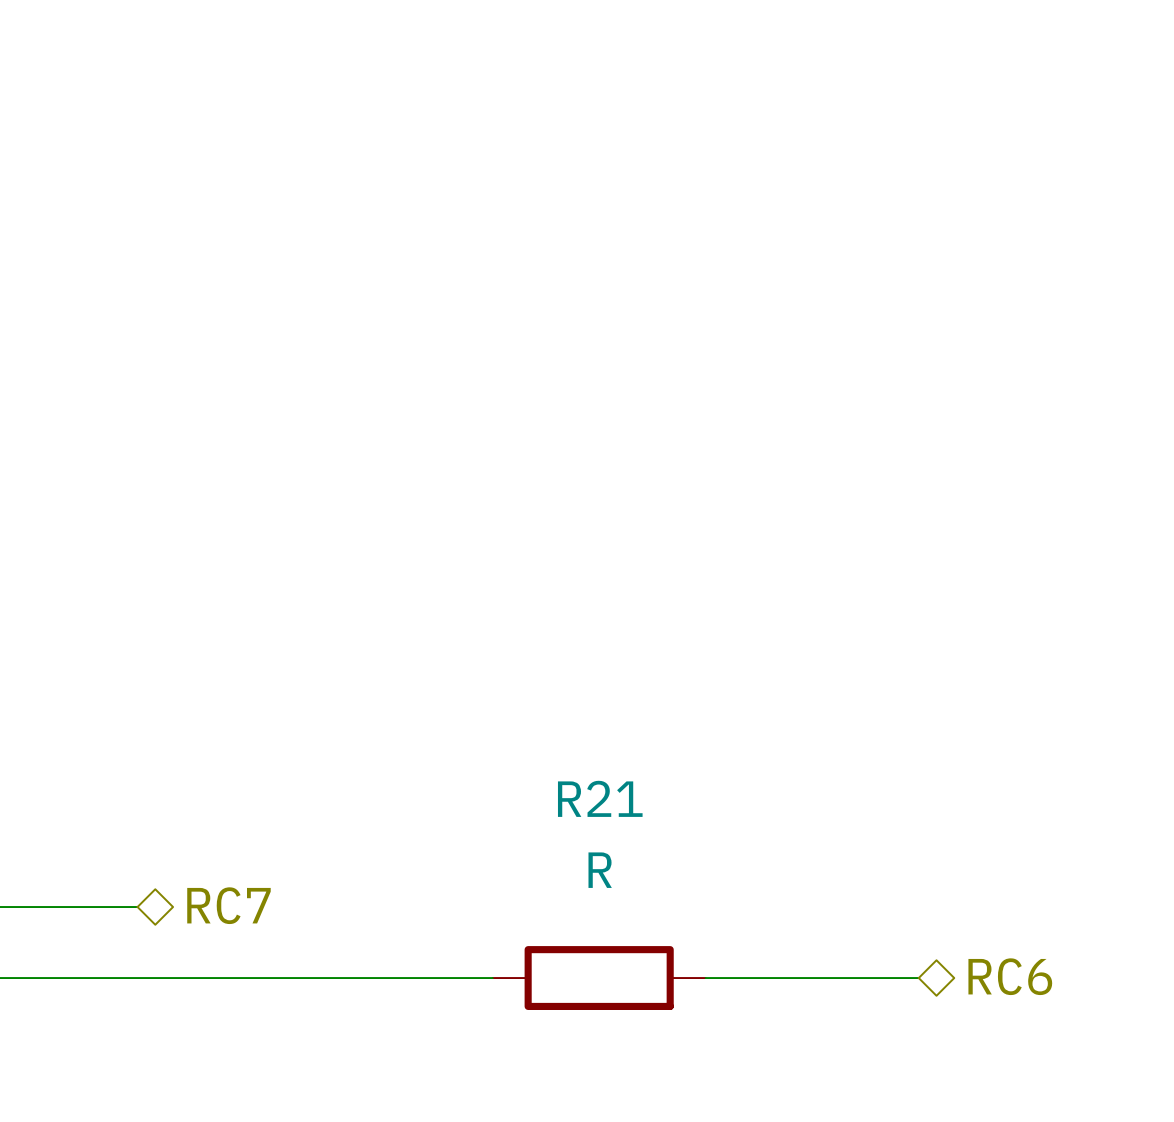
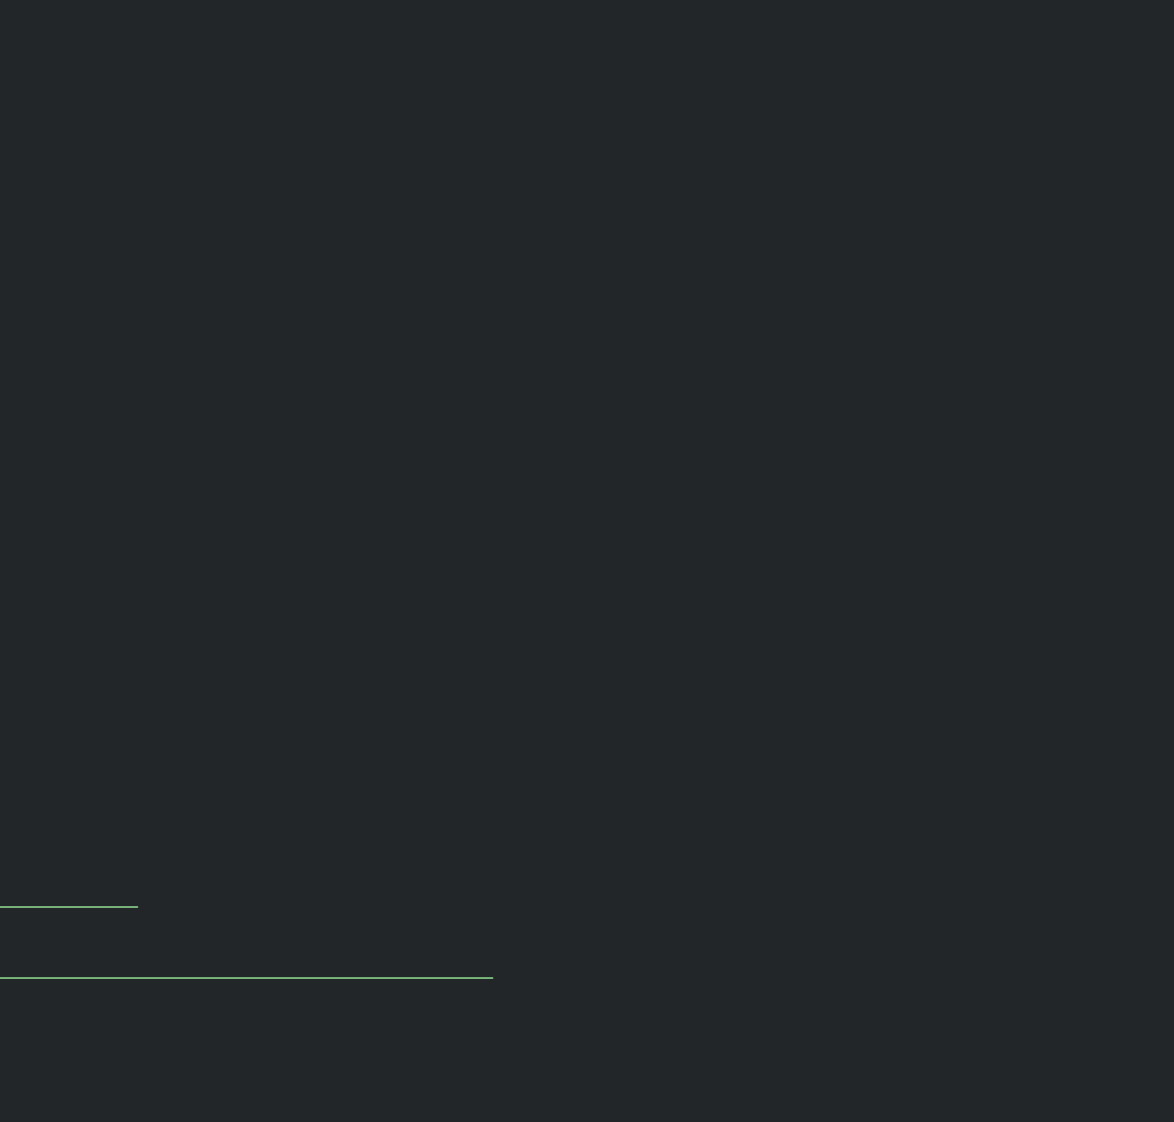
hierarchical label: RC7 (228, 905) -> none
hierarchical label: RC6 (1010, 976) -> none
R21: R (599, 978) -> none
wire: (705, 978) (918, 978) -> none

